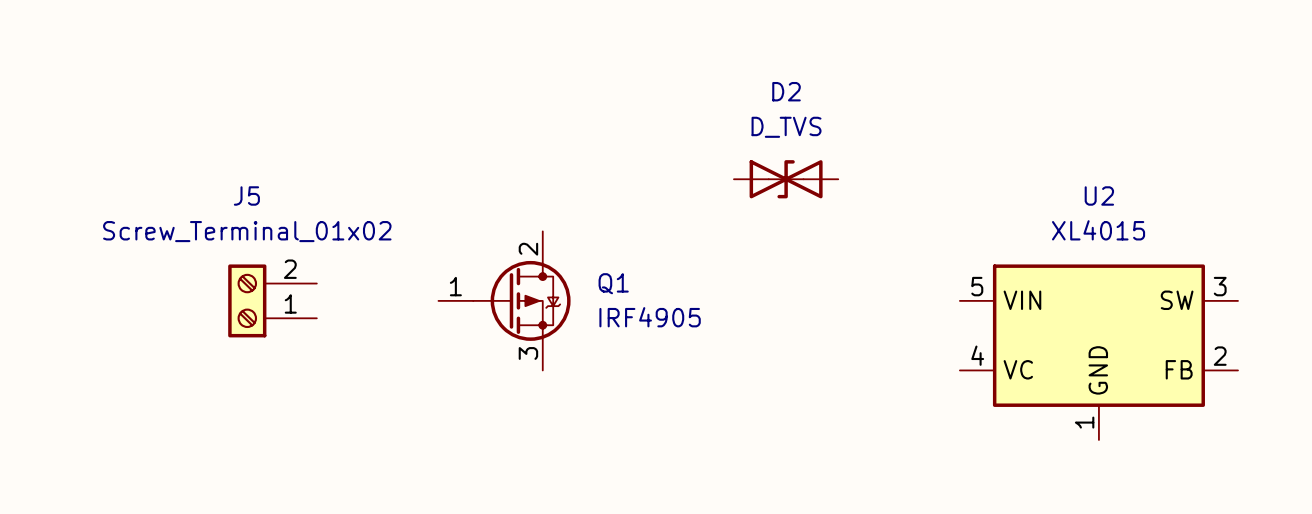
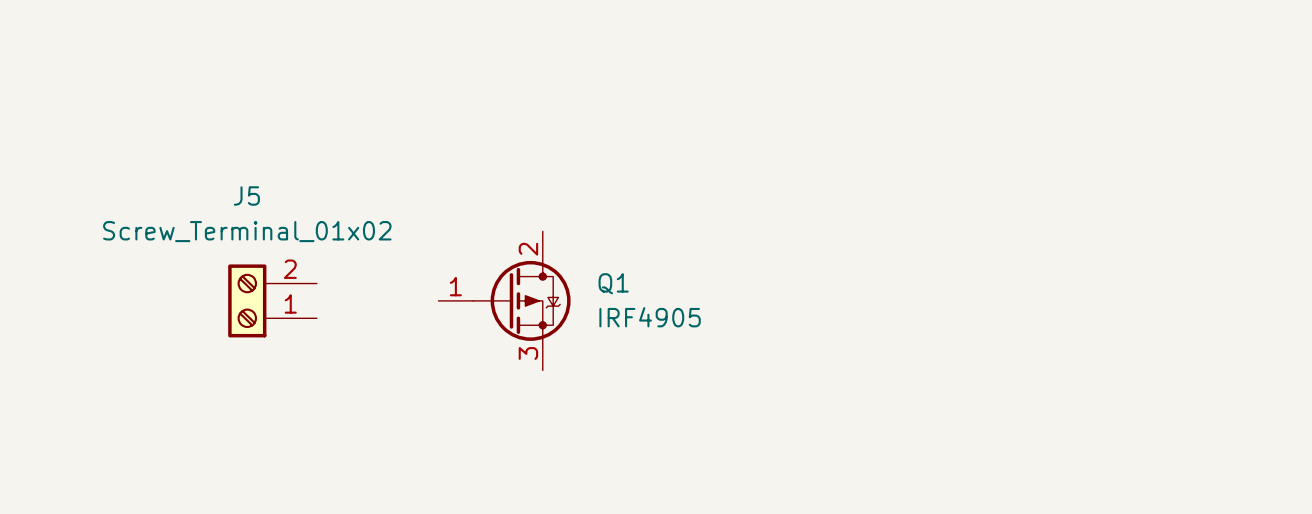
D2: D_TVS (786, 179) -> none
U2: XL4015 (1098, 352) -> none

